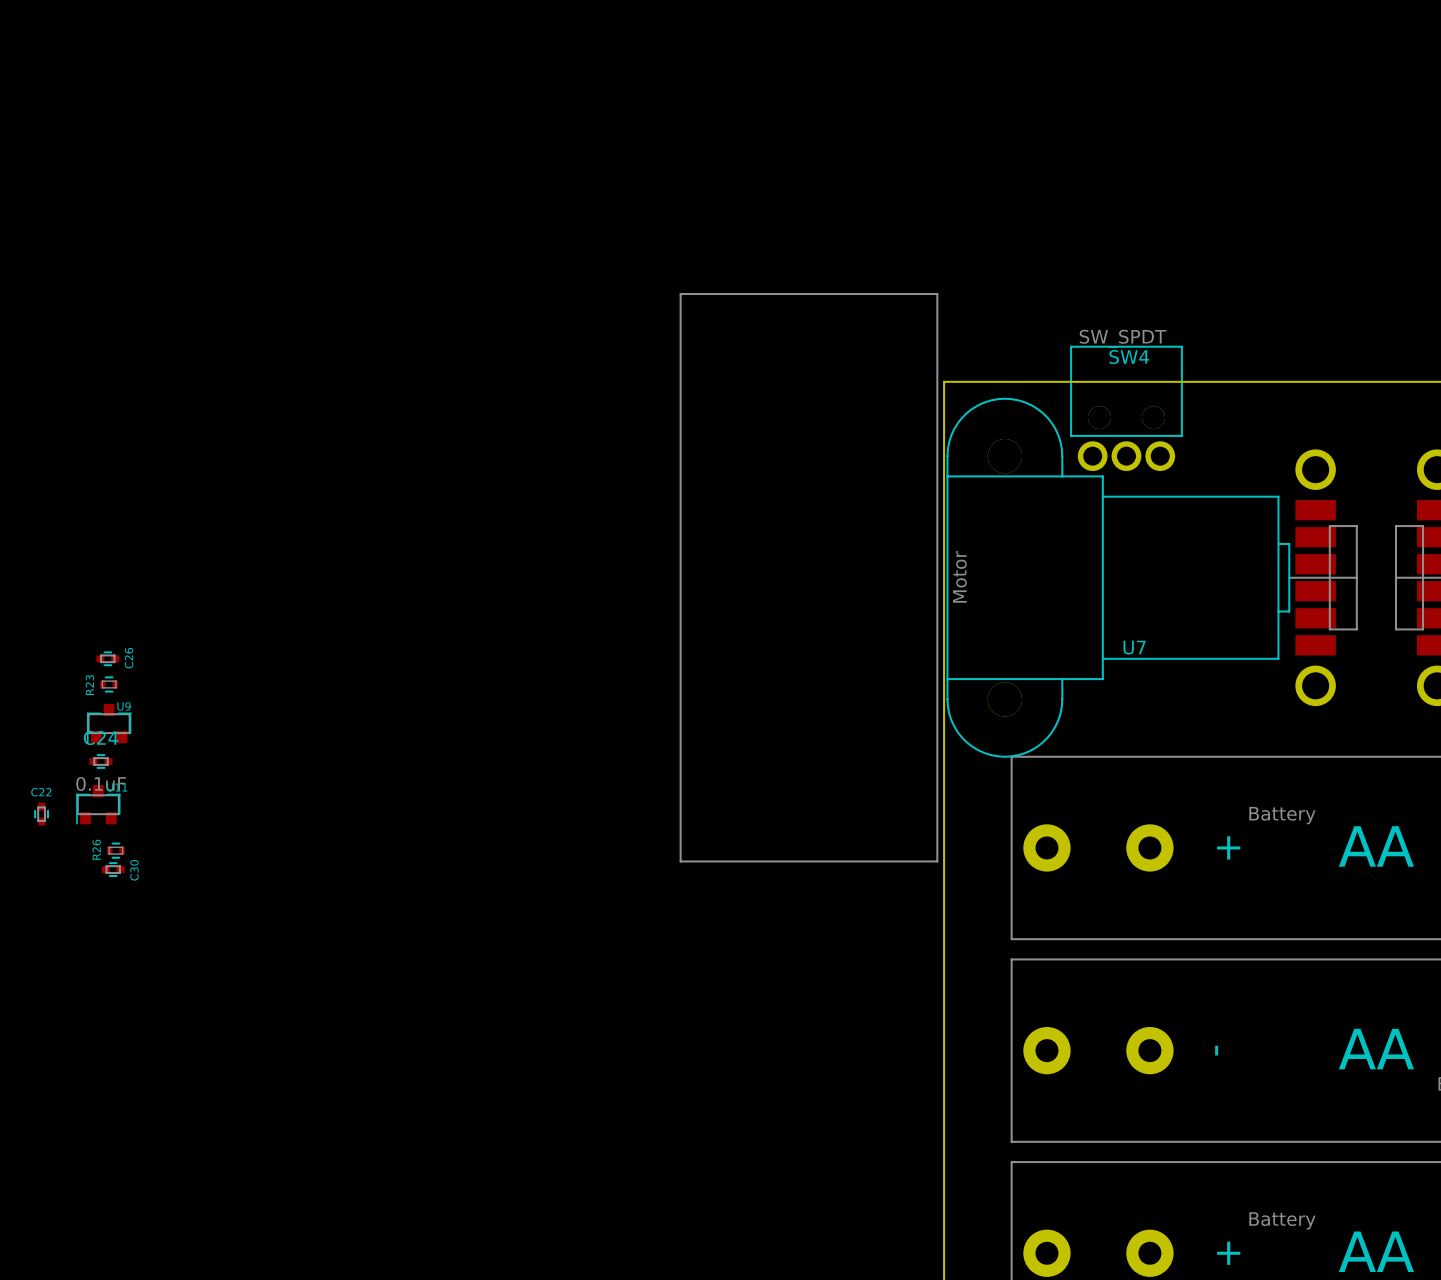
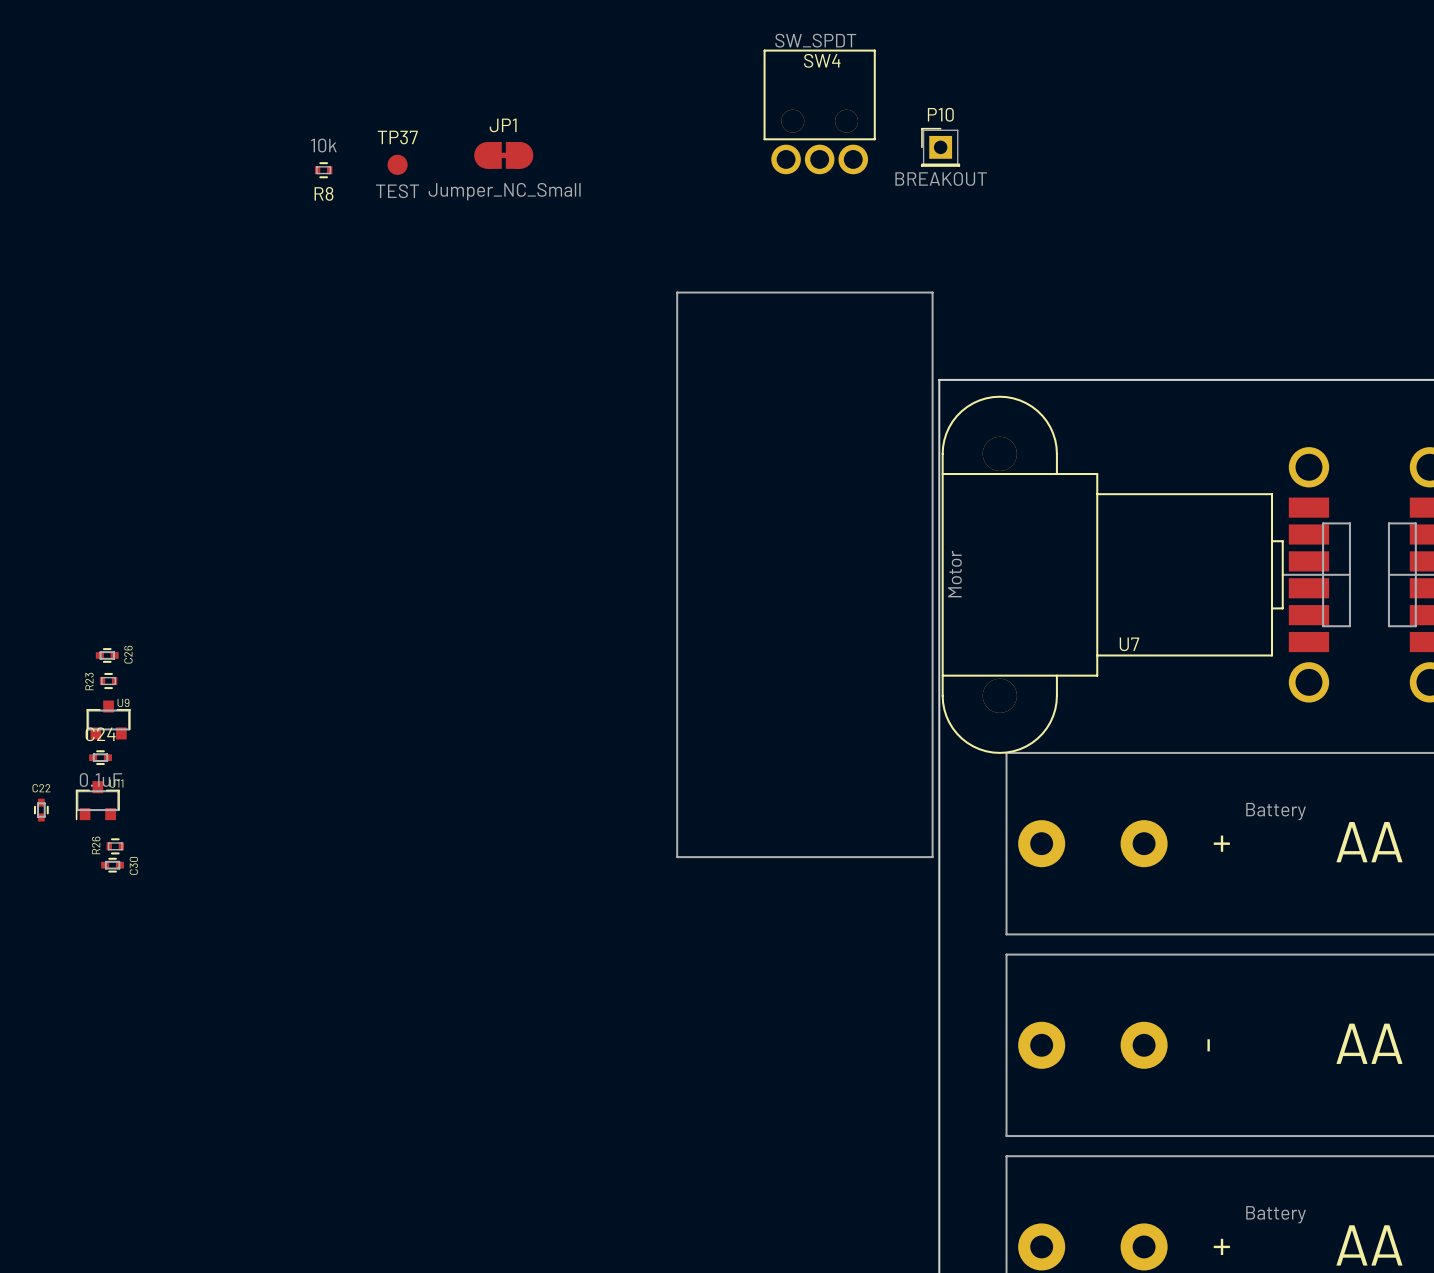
P10: none -> BREAKOUT (940, 147)
JP1: none -> Jumper_NC_Small (503, 155)
TP37: none -> TEST (397, 164)
R8: none -> 10k (323, 170)
SW4 position: (1126, 408) -> (819, 111)

